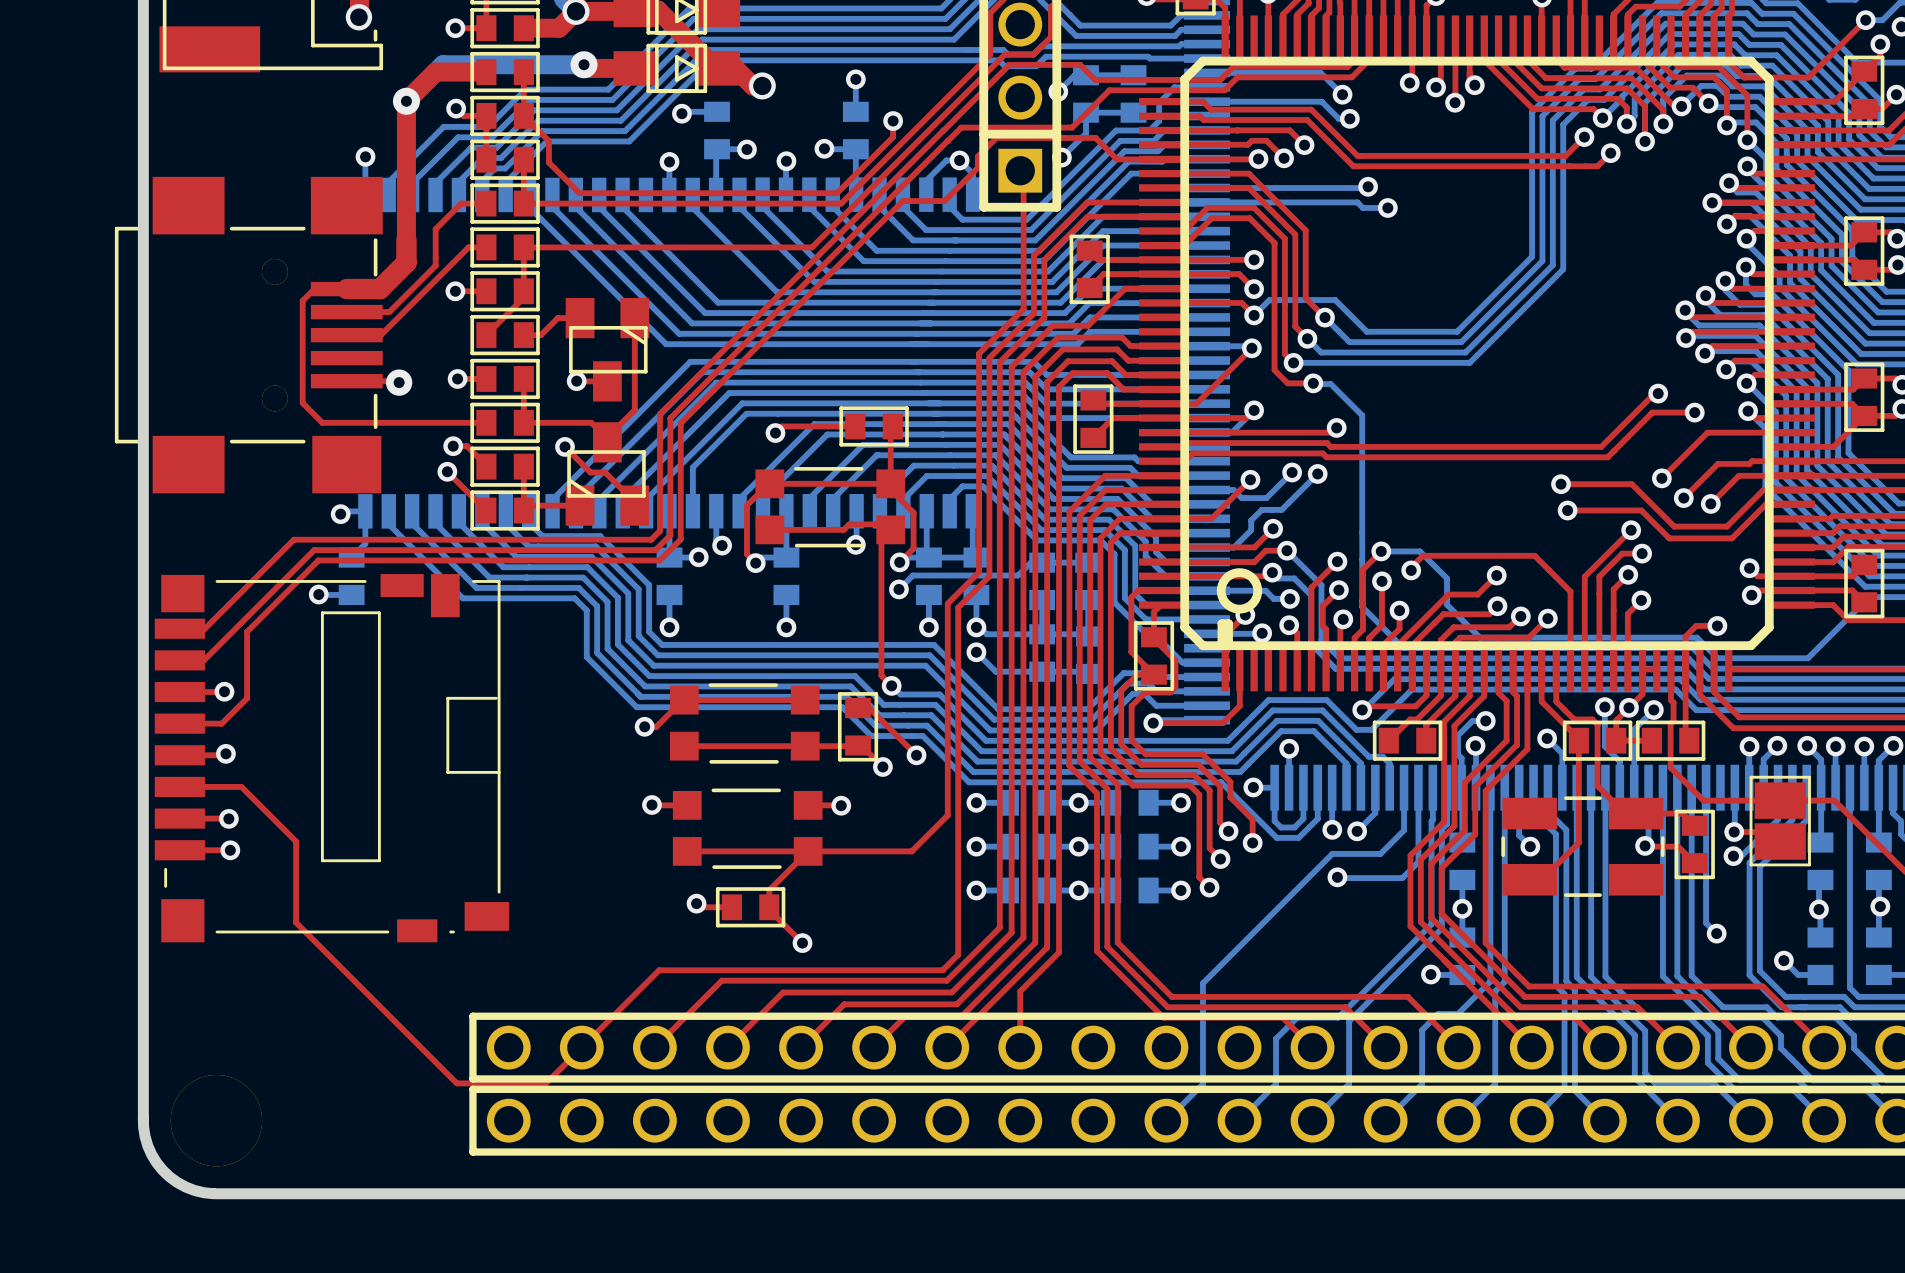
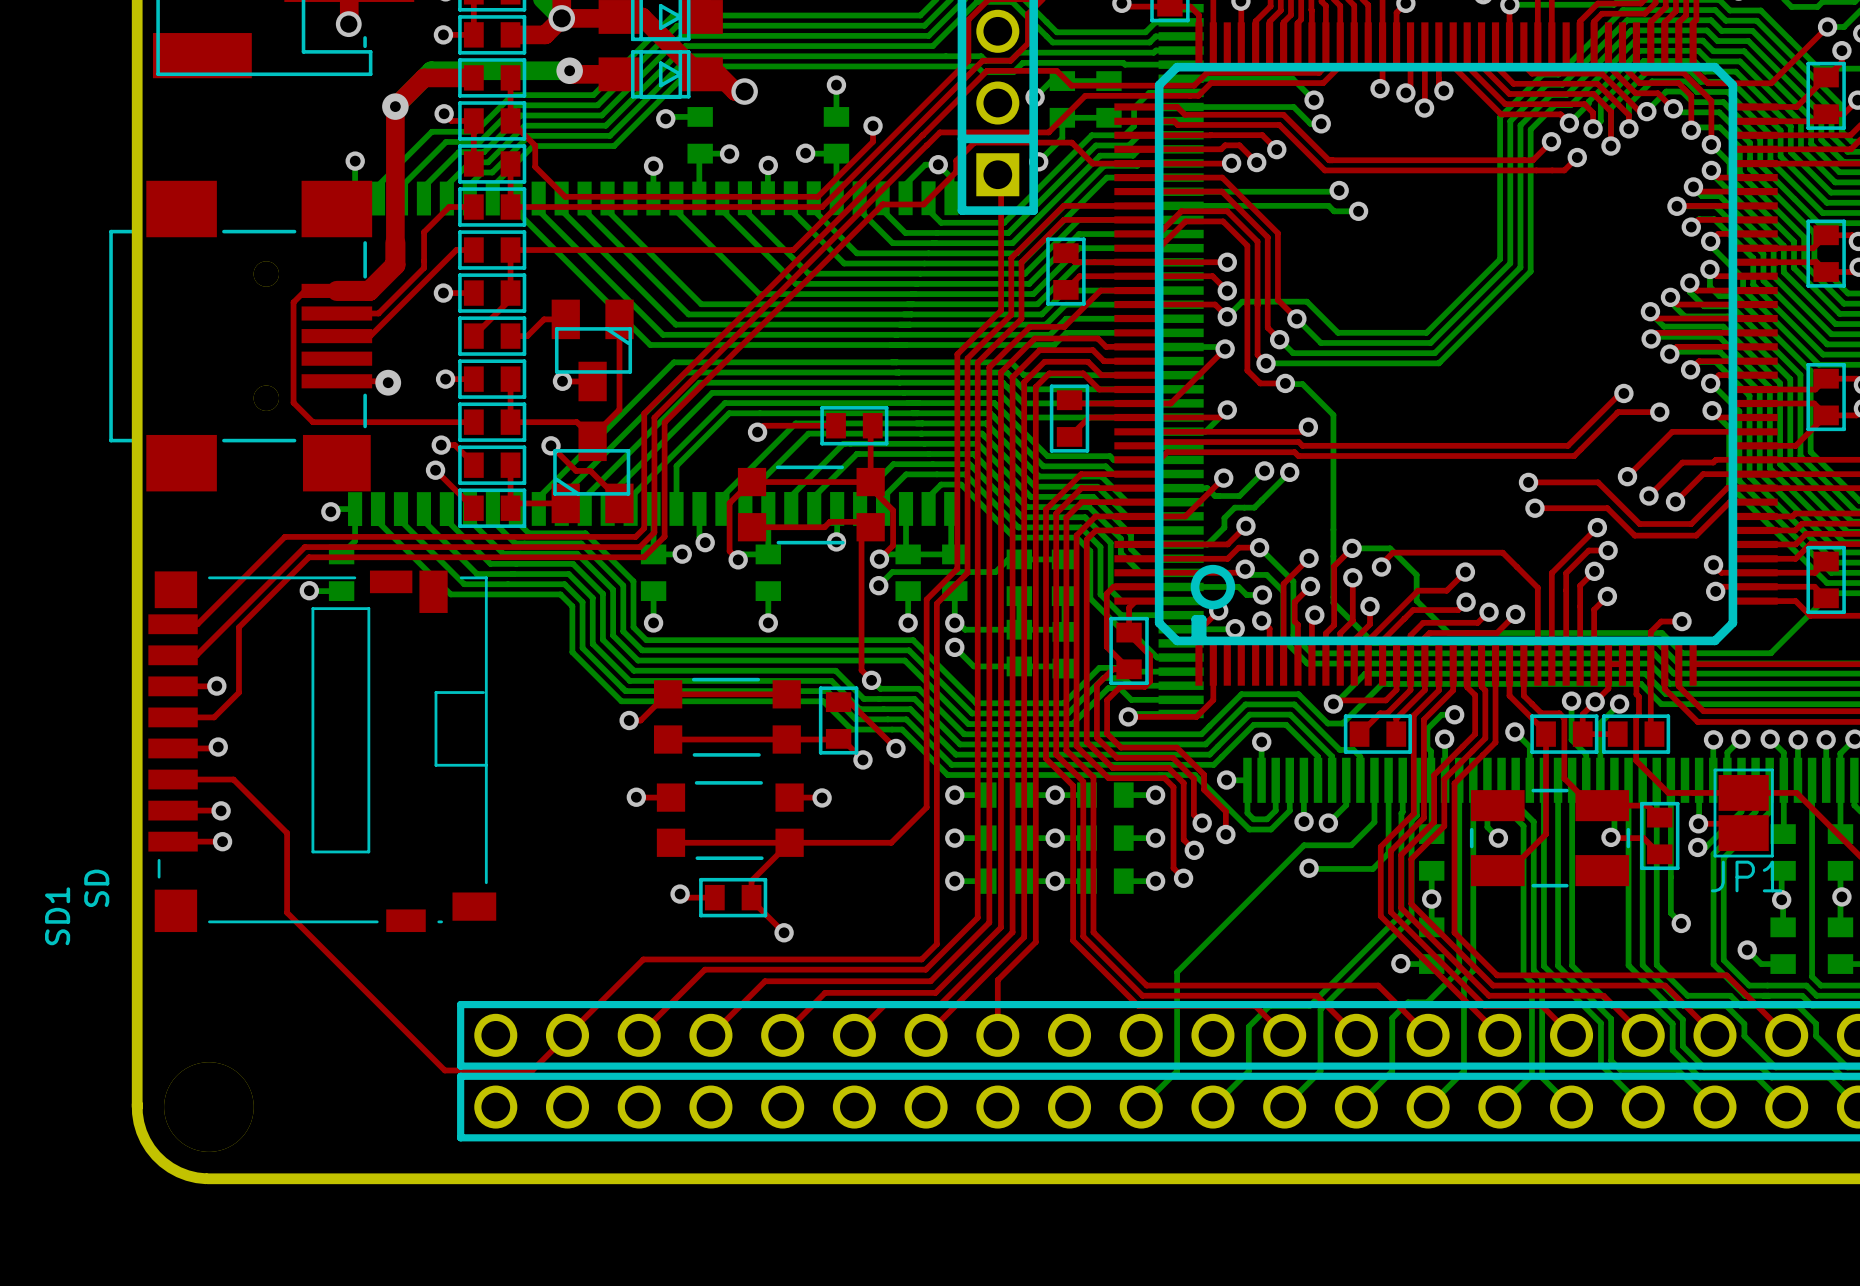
JP1 name: none -> JP1 (1746, 876)
SD1 value: none -> SD (96, 888)
SD1 name: none -> SD1 (57, 916)

